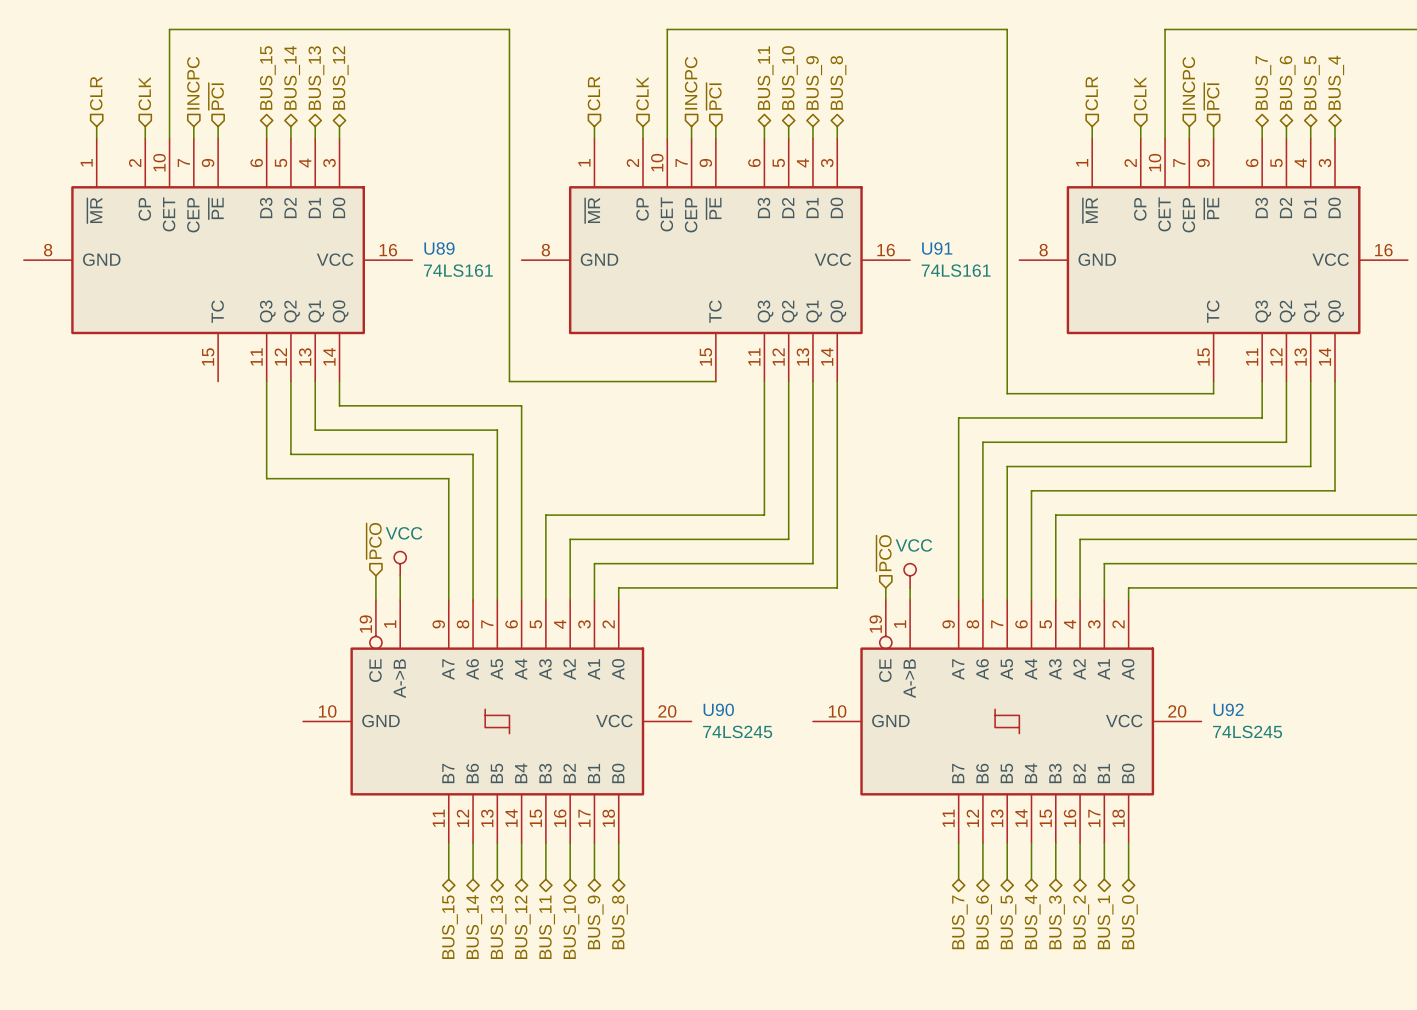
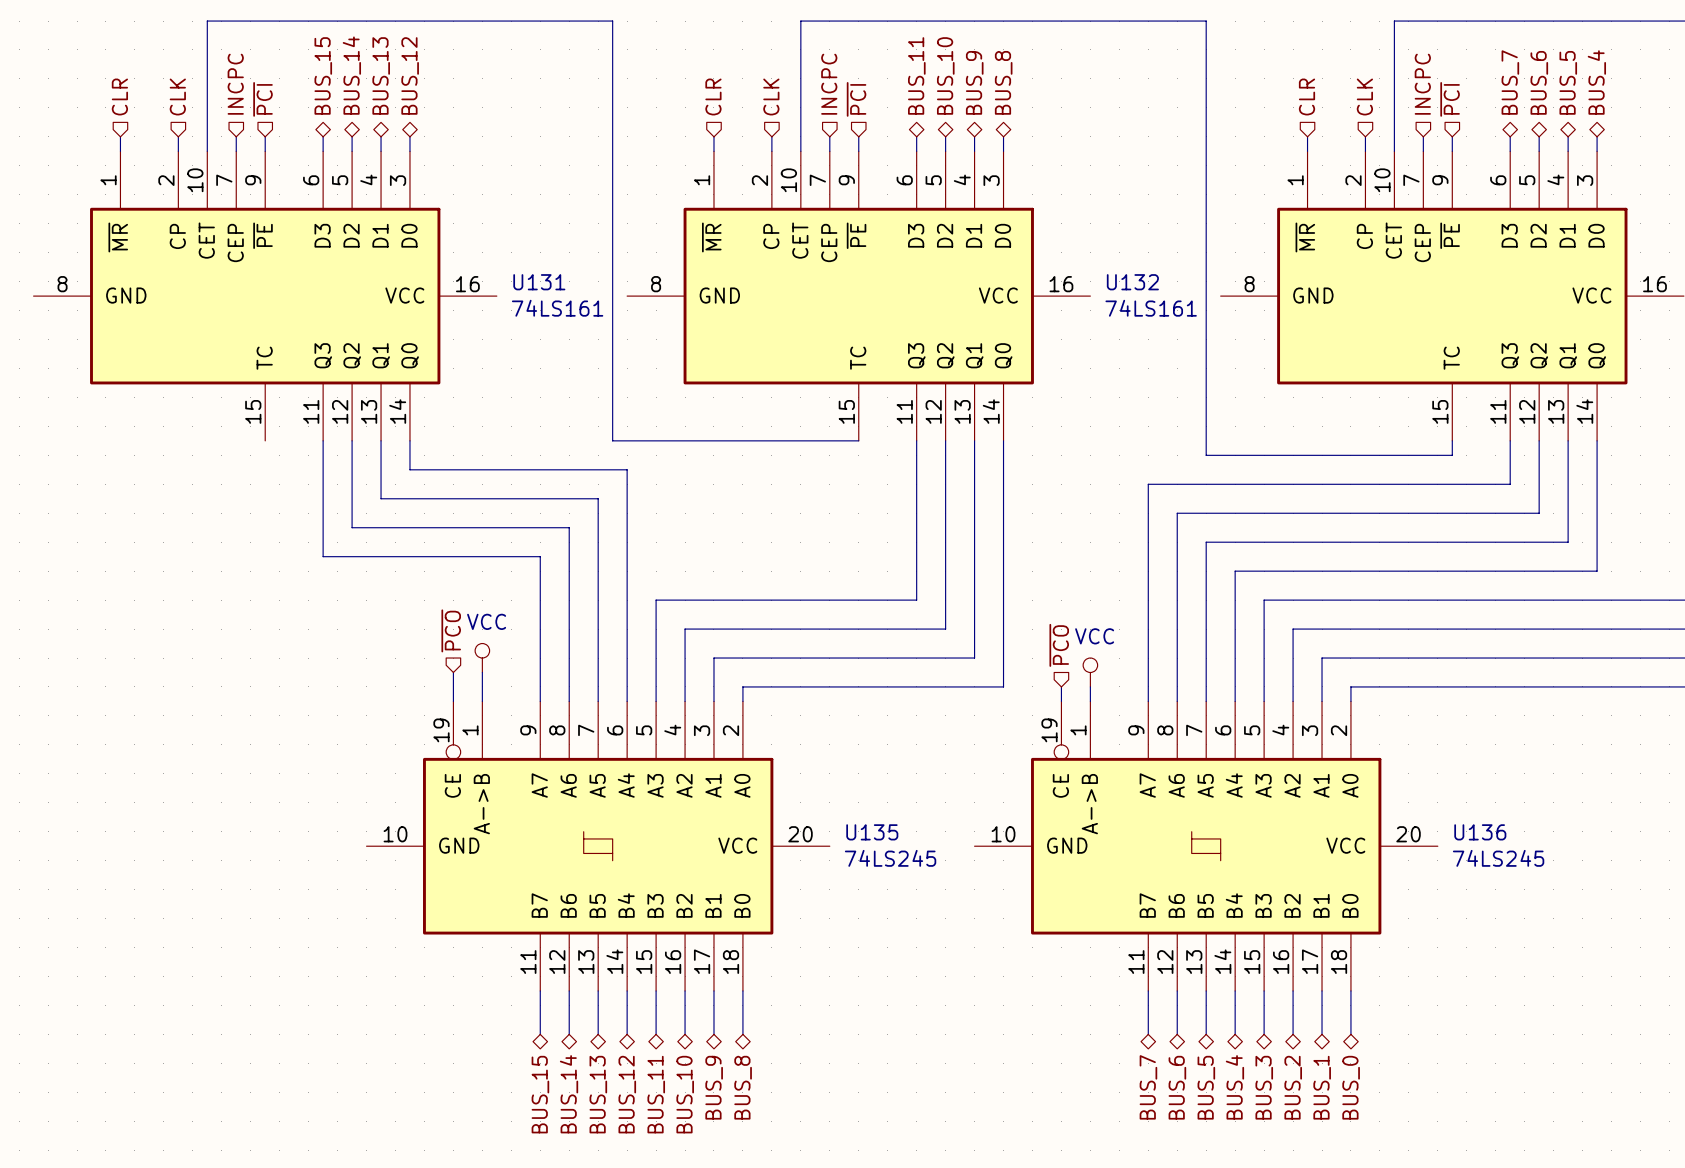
U89 name: U89 (439, 248) -> U131 (539, 282)
U91 name: U91 (937, 248) -> U132 (1132, 282)
U90 name: U90 (718, 709) -> U135 (872, 832)
U92 name: U92 (1228, 709) -> U136 (1480, 832)

